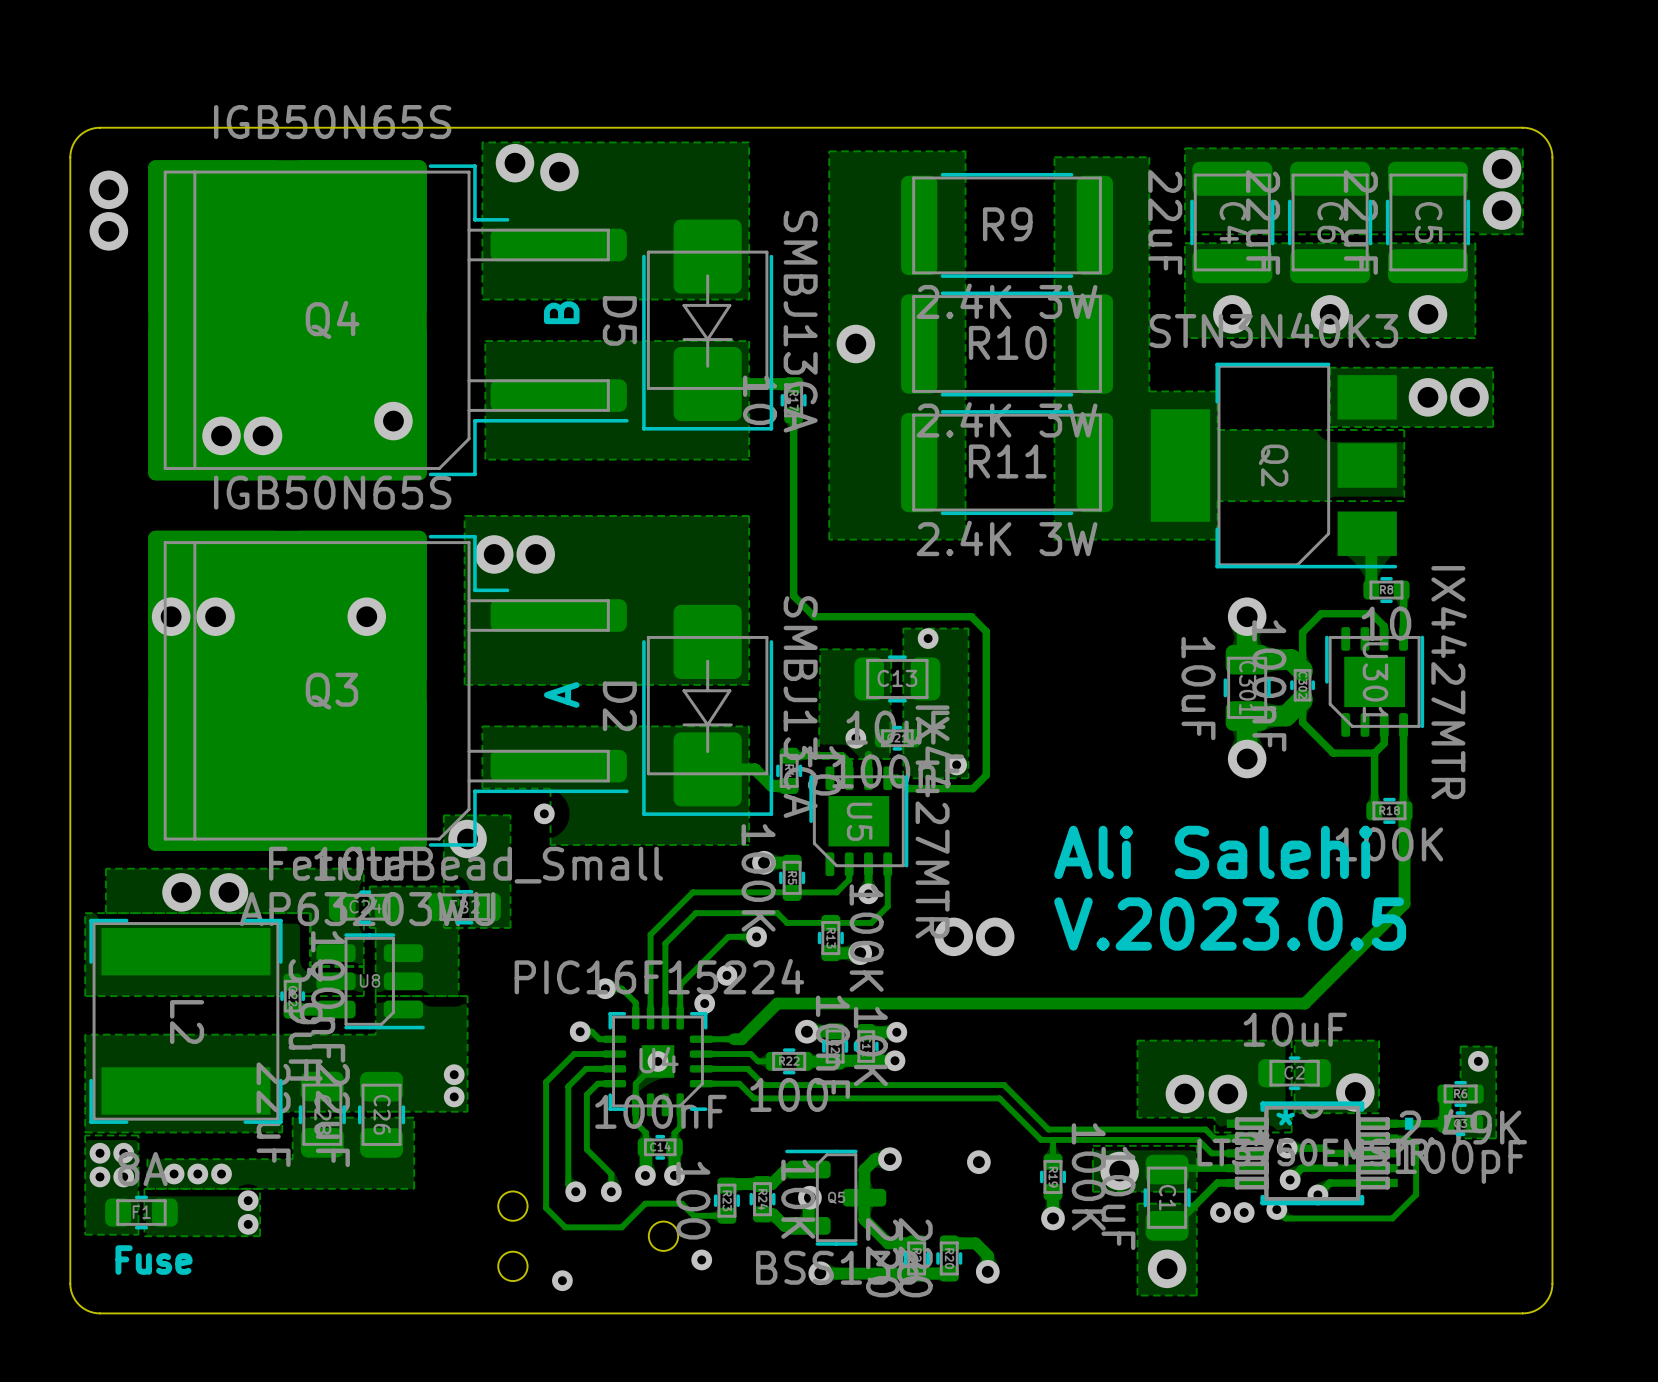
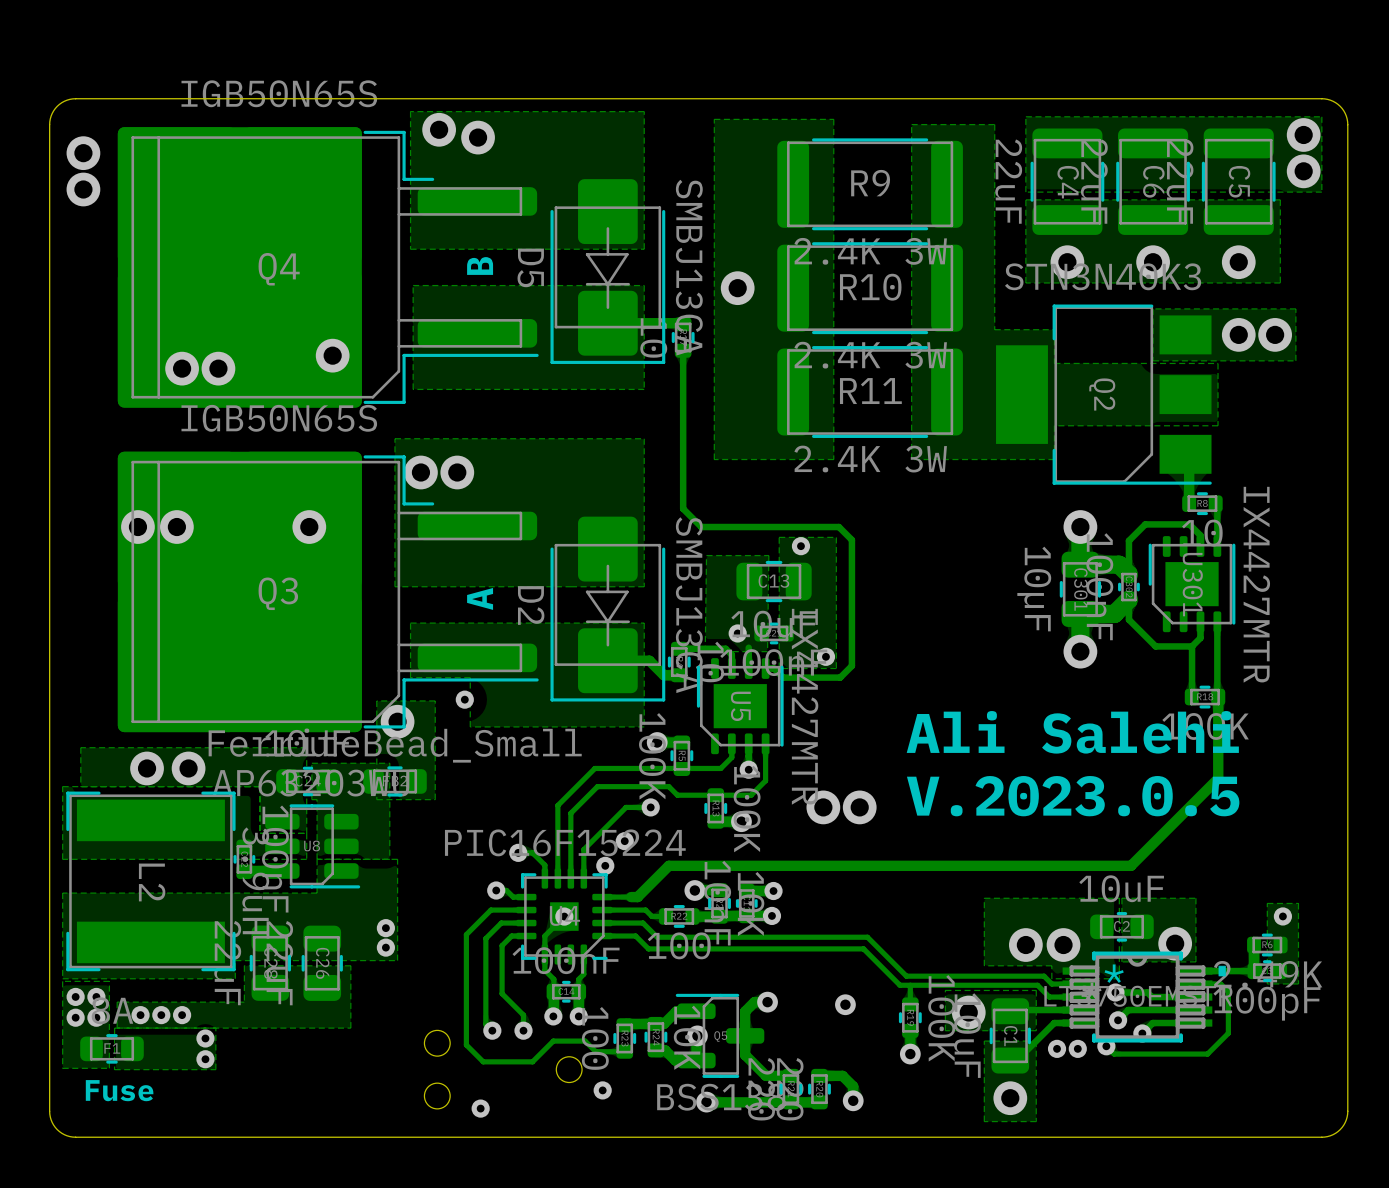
C301 value: 10uF (1198, 688) -> 10µF (1034, 589)

